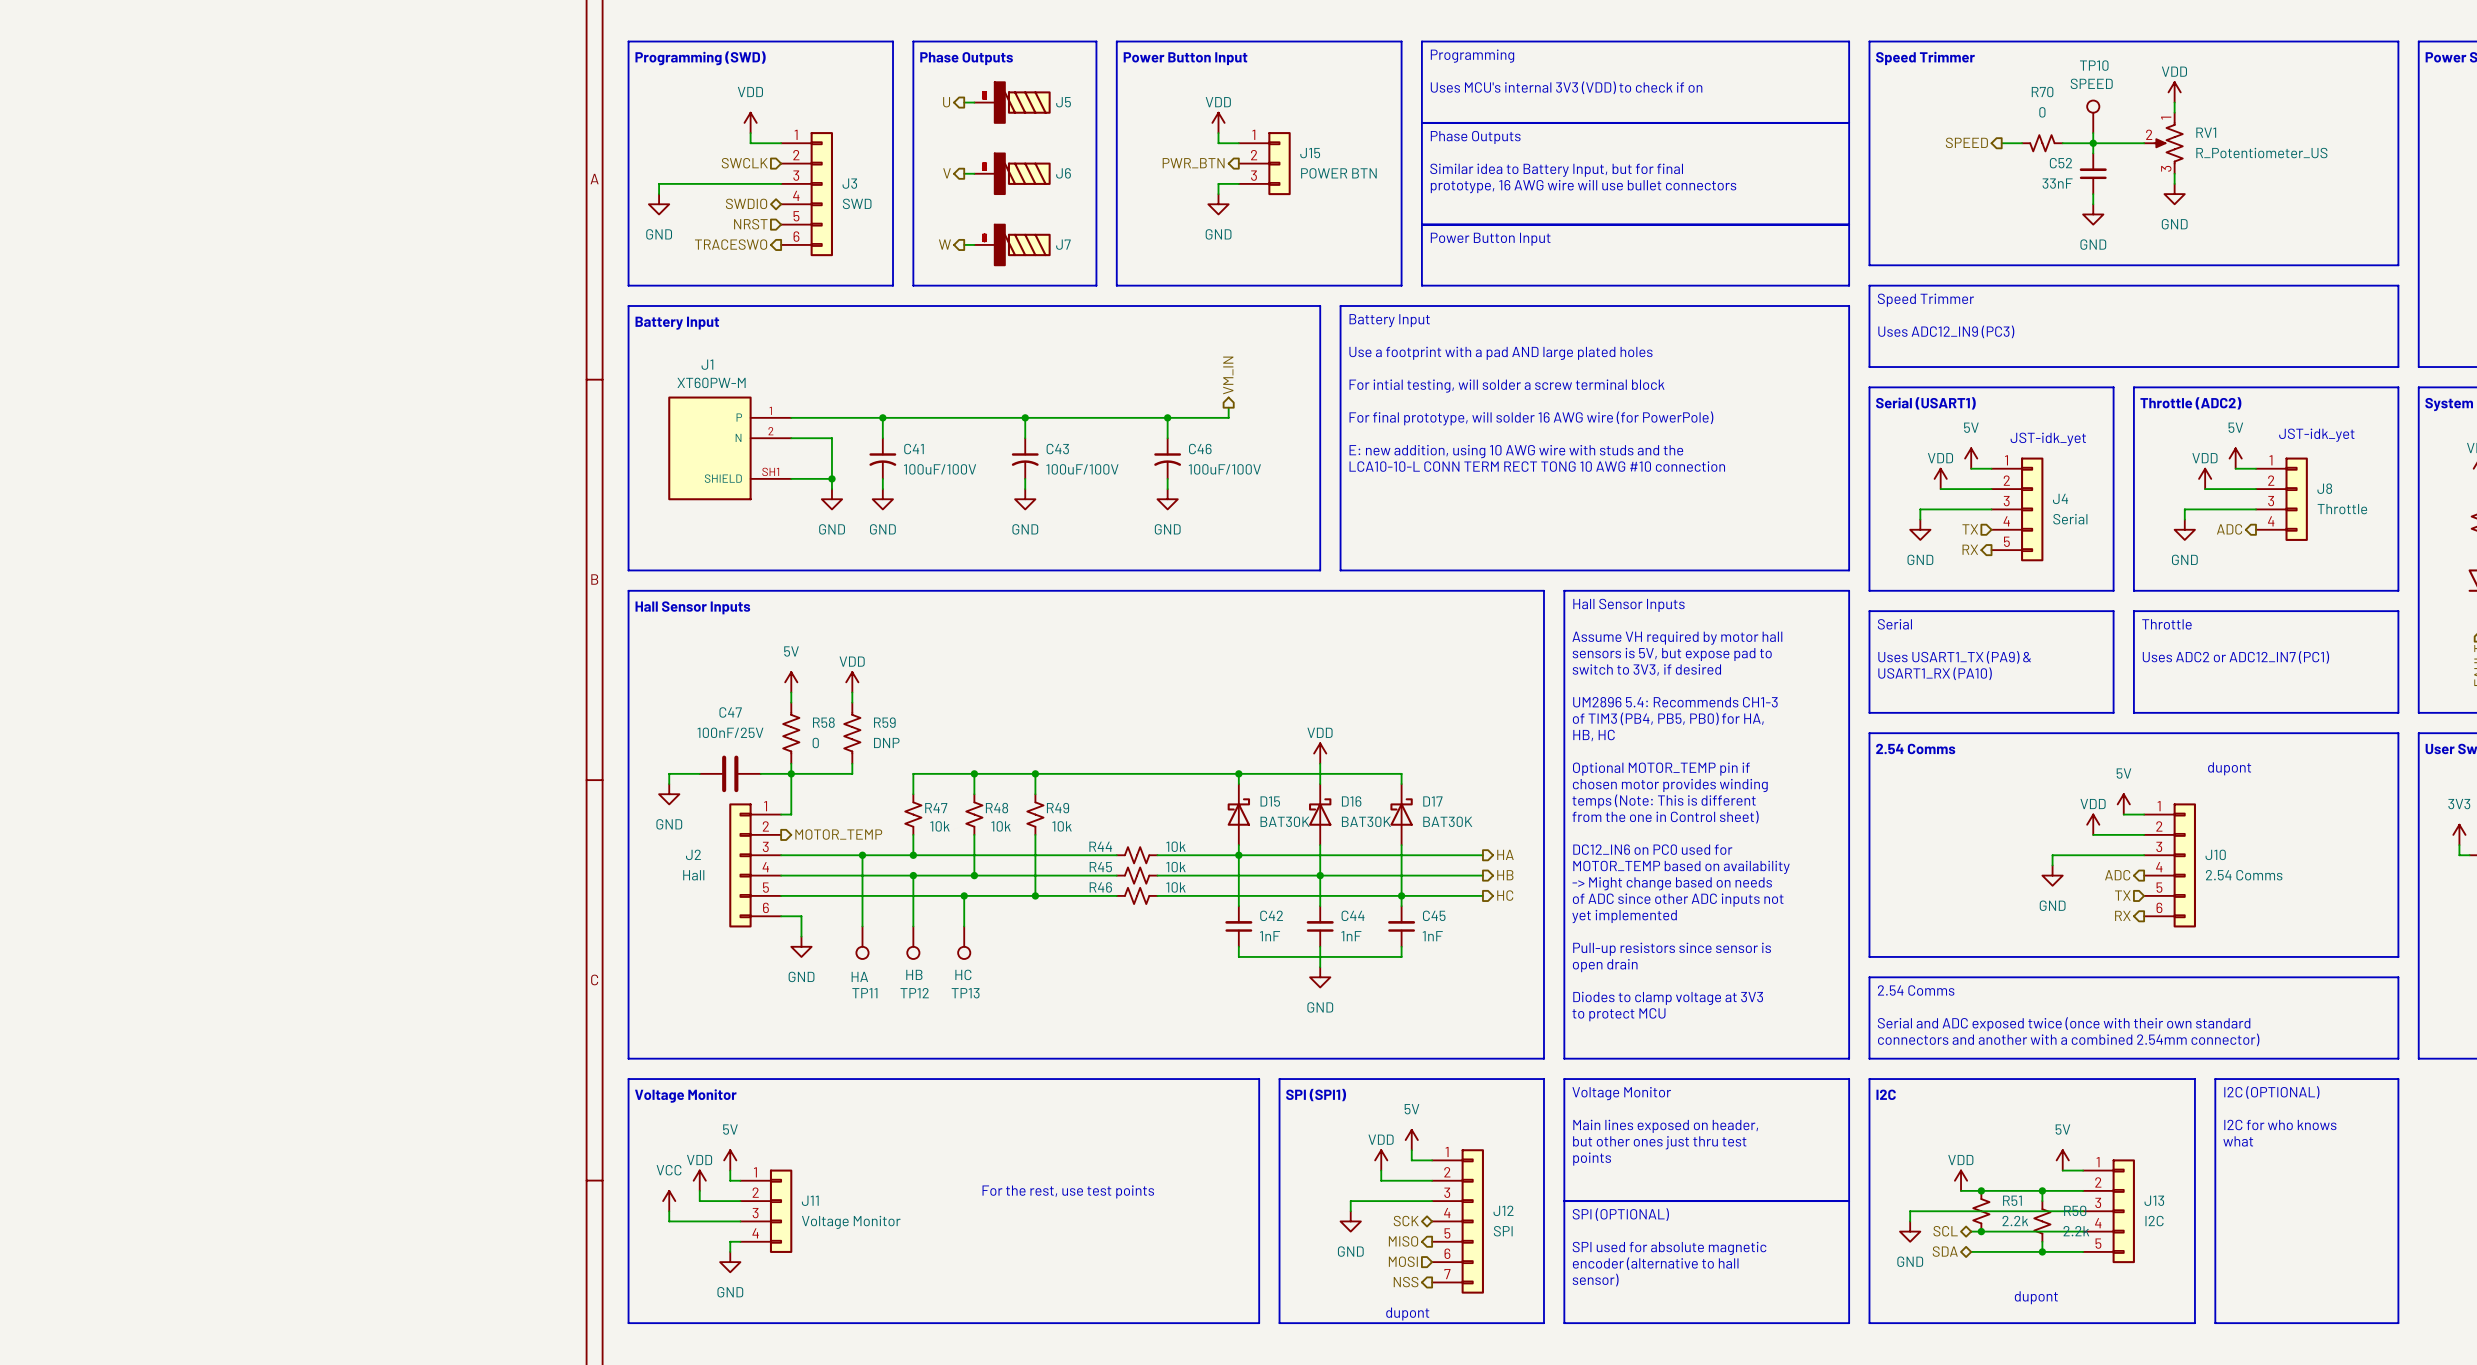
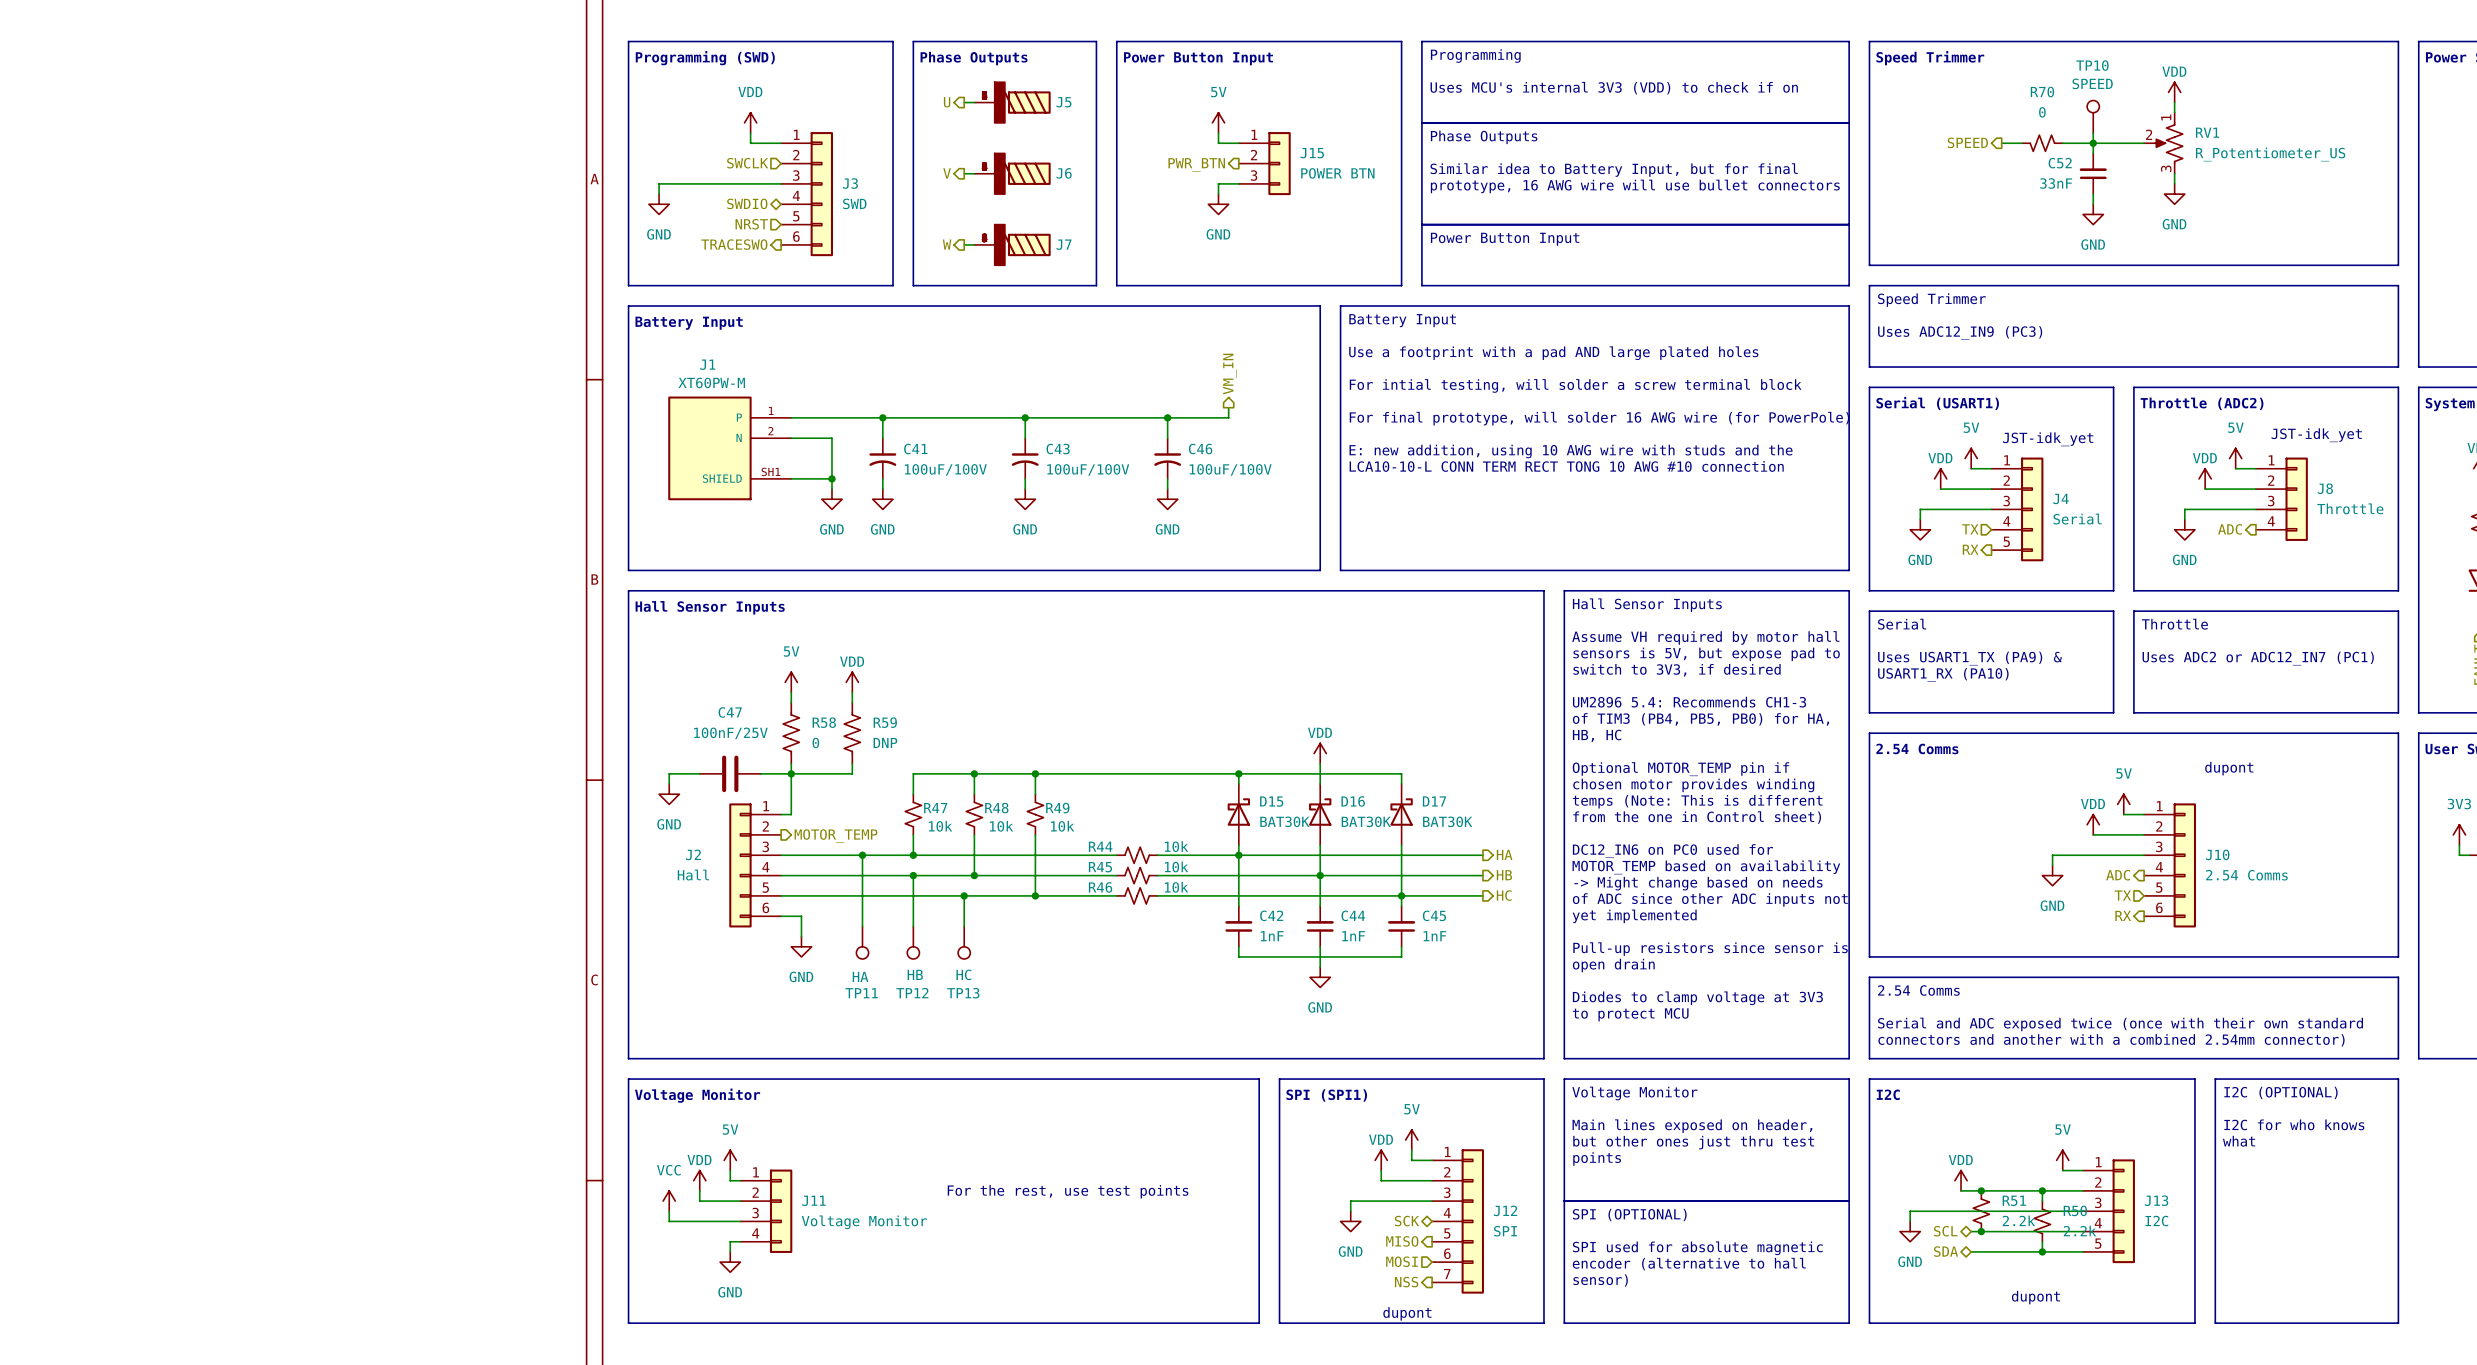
power symbol: VDD (1218, 122) -> 5V (1218, 122)

